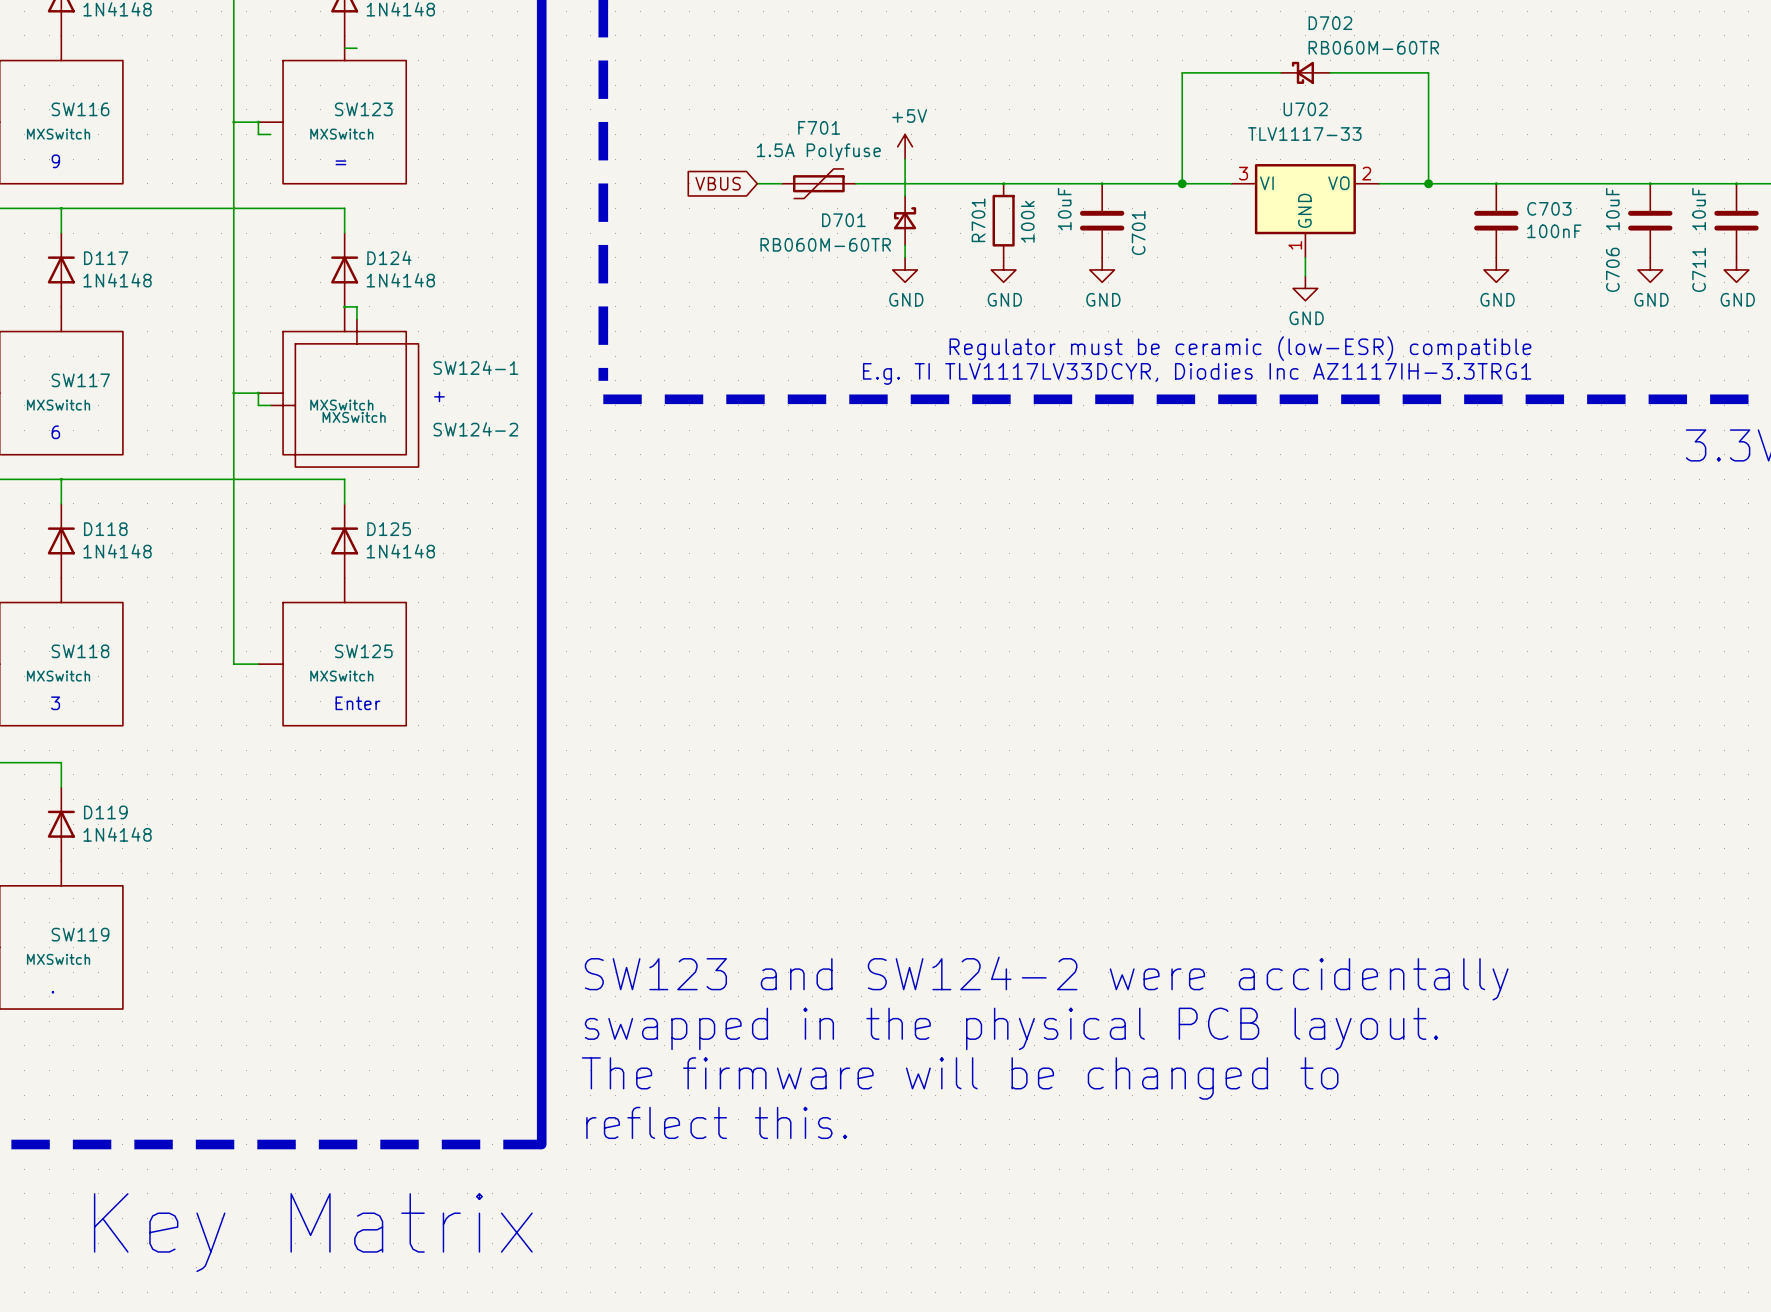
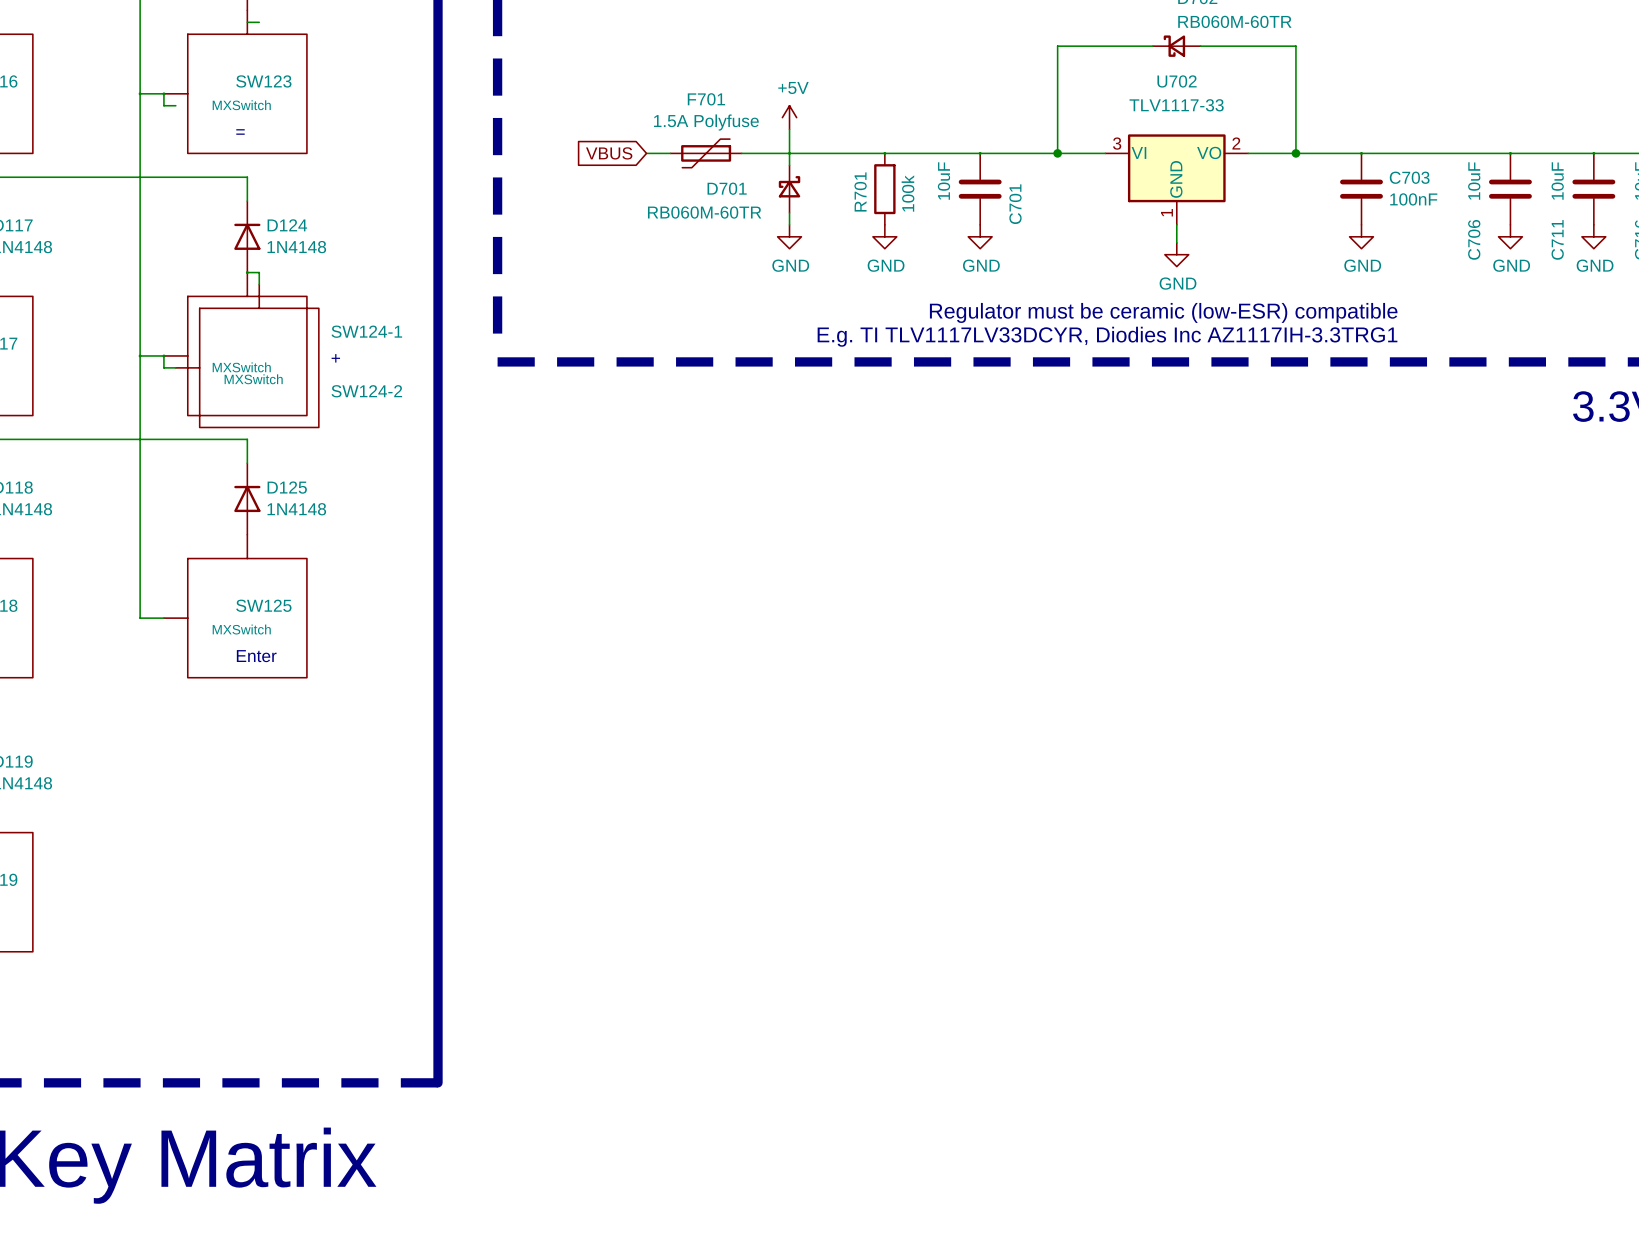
text: SW123 and SW124-2 were accidentally (1046, 978) -> none
text: swapped in the physical PCB layout. (1011, 1028) -> none
text: The firmware will be changed to (960, 1078) -> none
text: reflect this. (716, 1122) -> none

